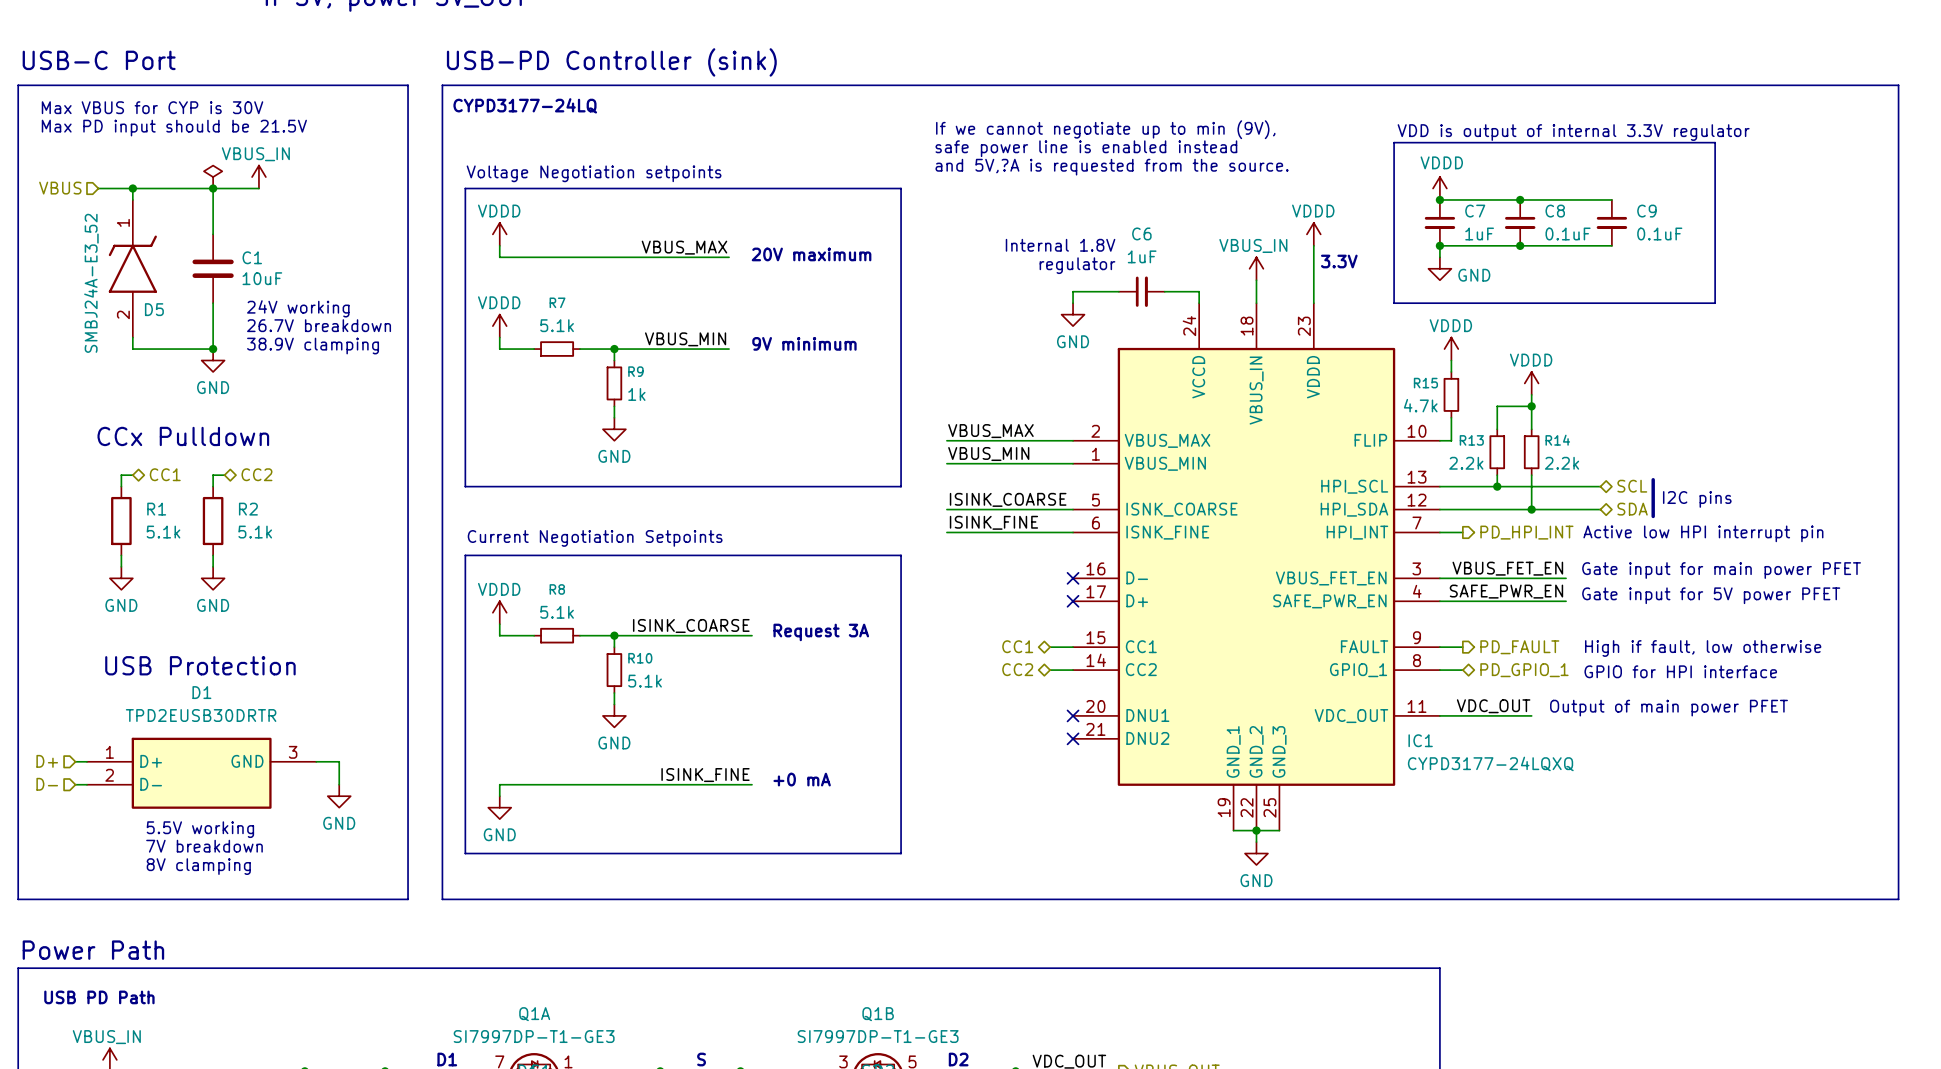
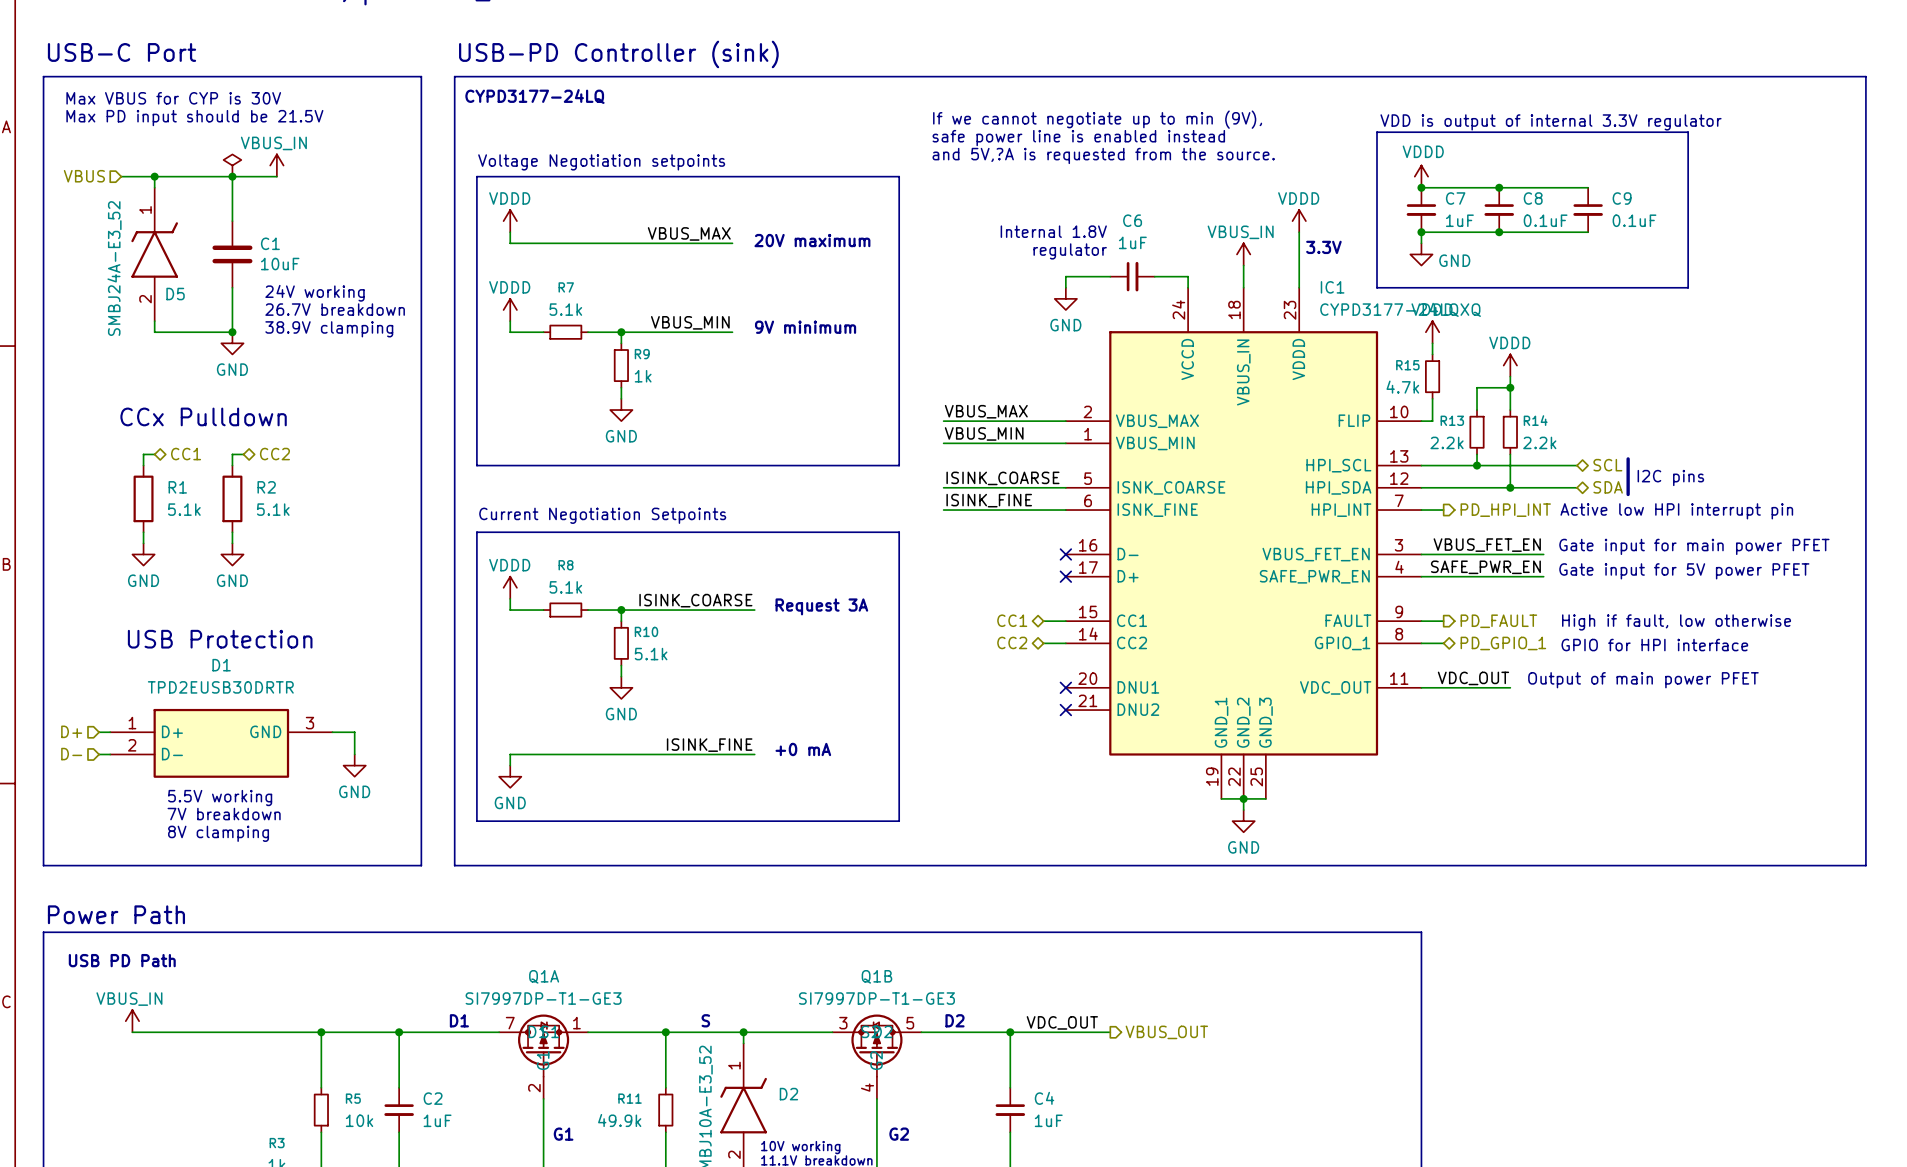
IC1 name position: IC1 (1420, 740) -> IC1 (1332, 287)
IC1 value position: CYPD3177-24LQXQ (1490, 763) -> CYPD3177-24LQXQ (1400, 309)

